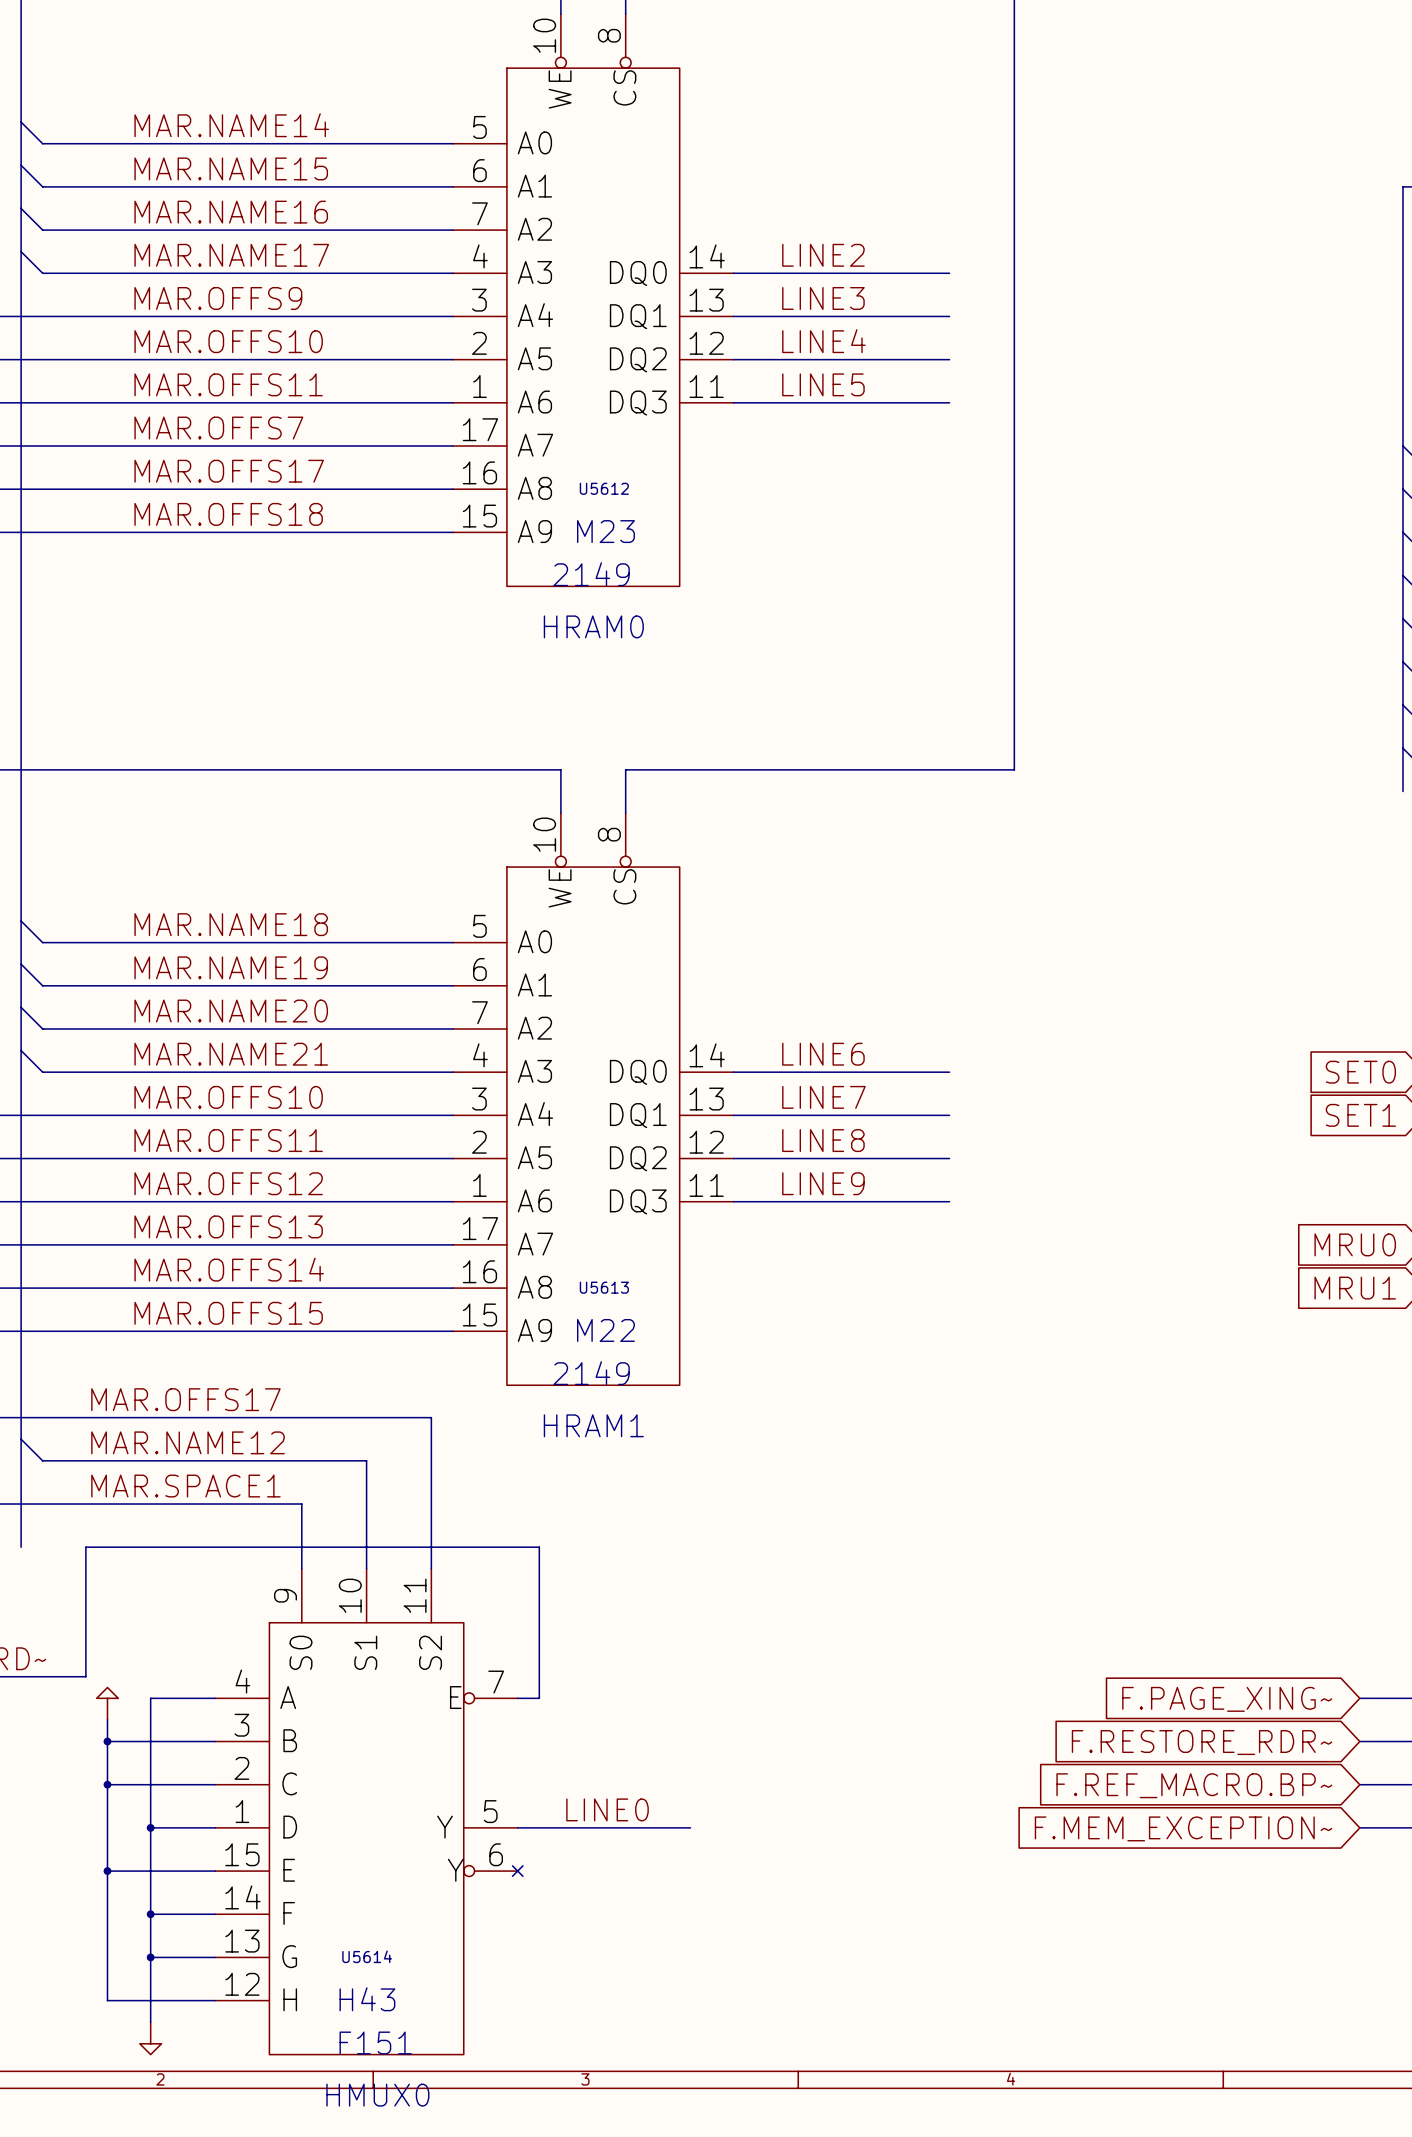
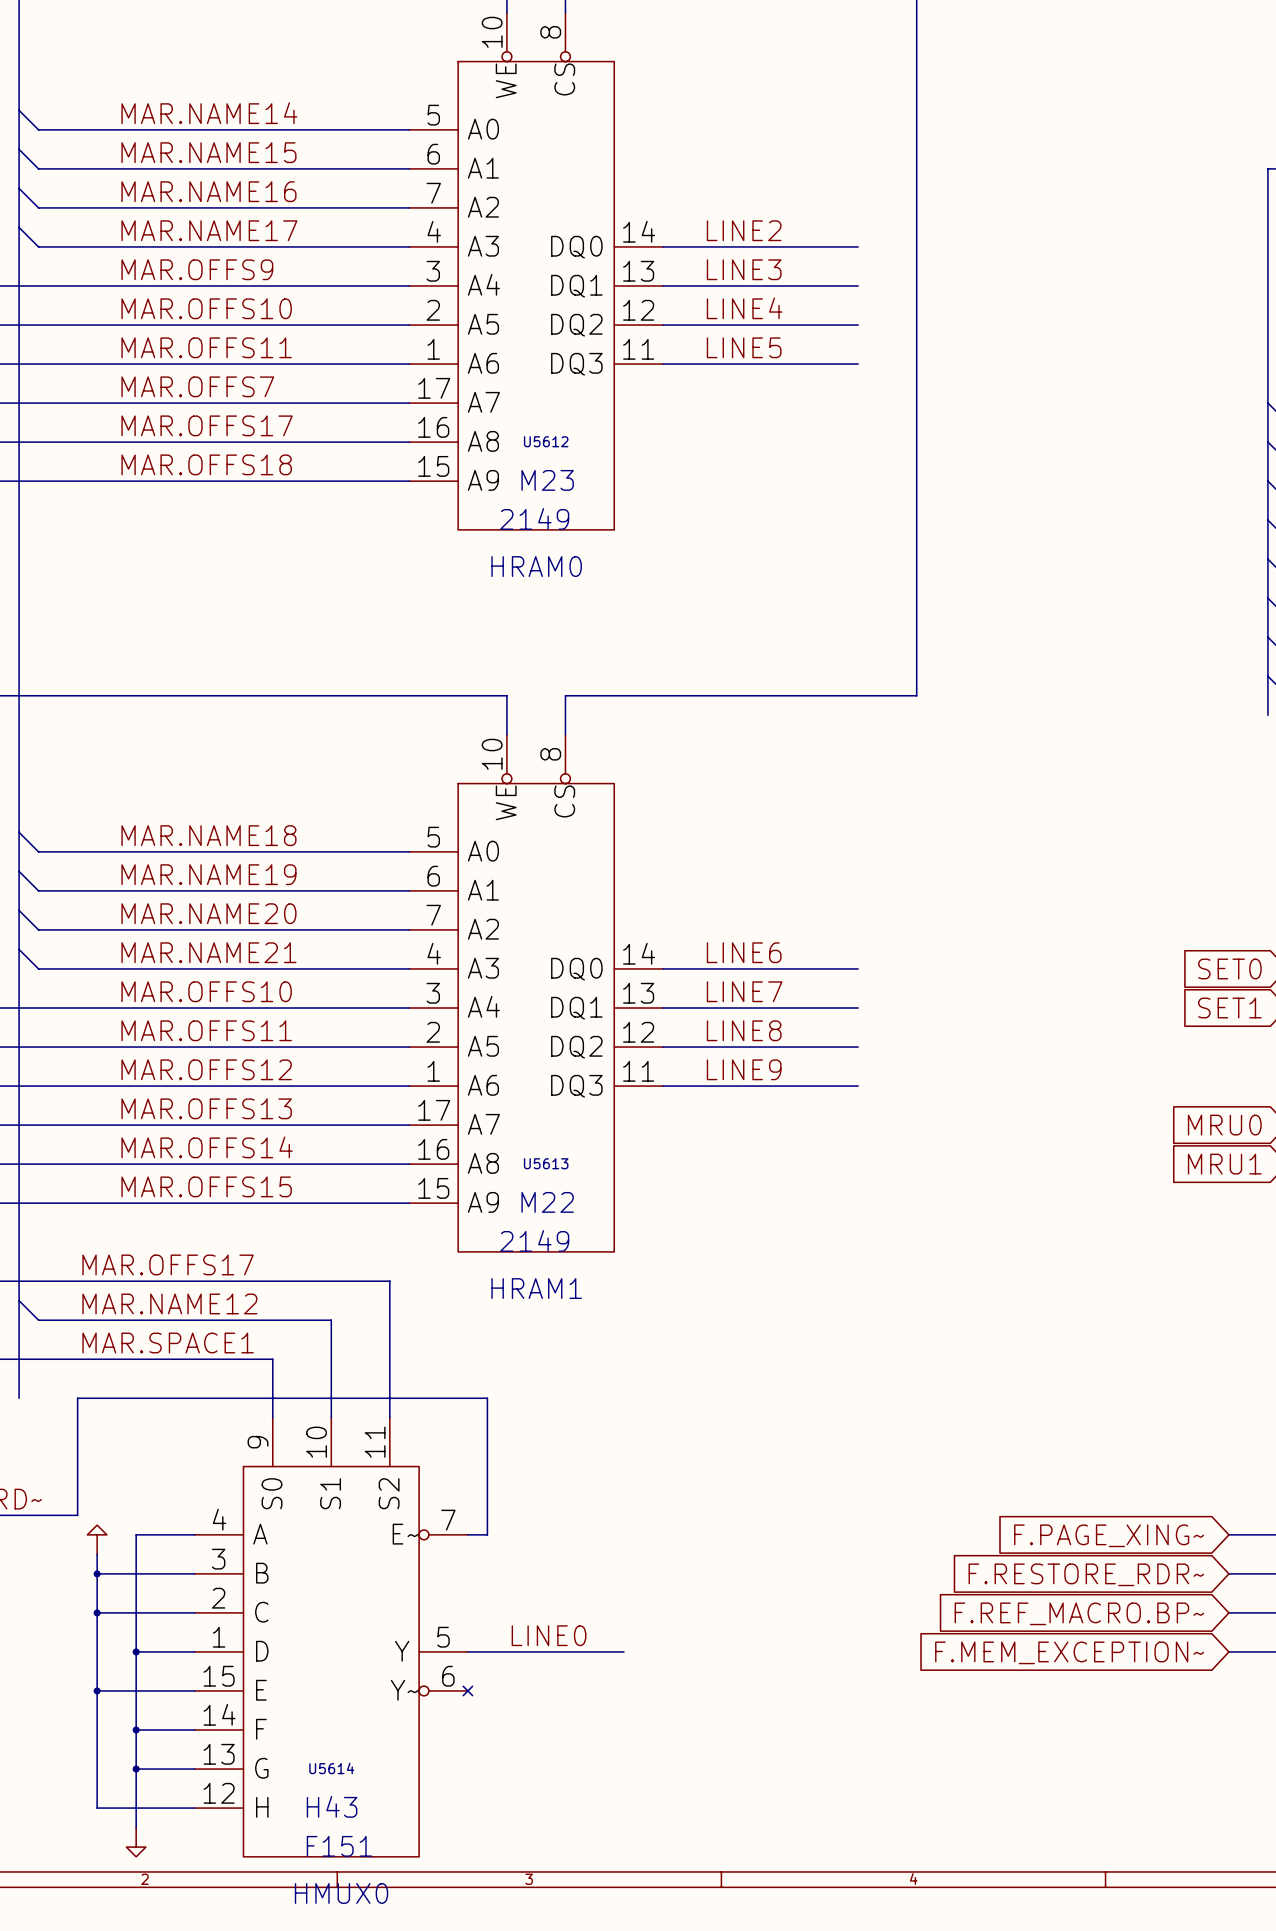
U5614 pin name: E (455, 1697) -> E~ (405, 1534)
U5614 pin name: Y (455, 1870) -> Y~ (404, 1690)

